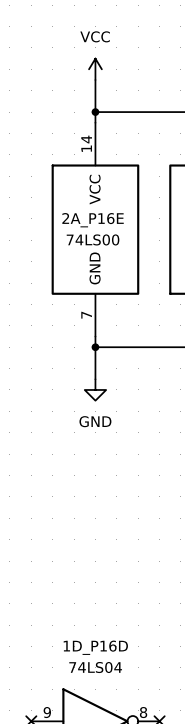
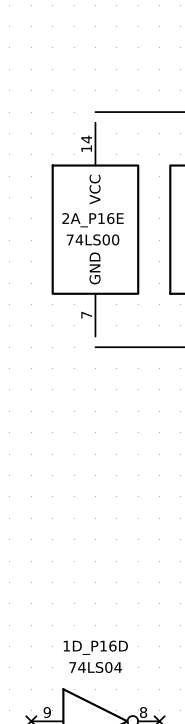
power symbol: VCC (95, 69) -> none
wire: (95, 80) (95, 122) -> none
junction: (95, 112) -> none
wire: (95, 336) (95, 379) -> none
junction: (95, 347) -> none
power symbol: GND (95, 389) -> none

